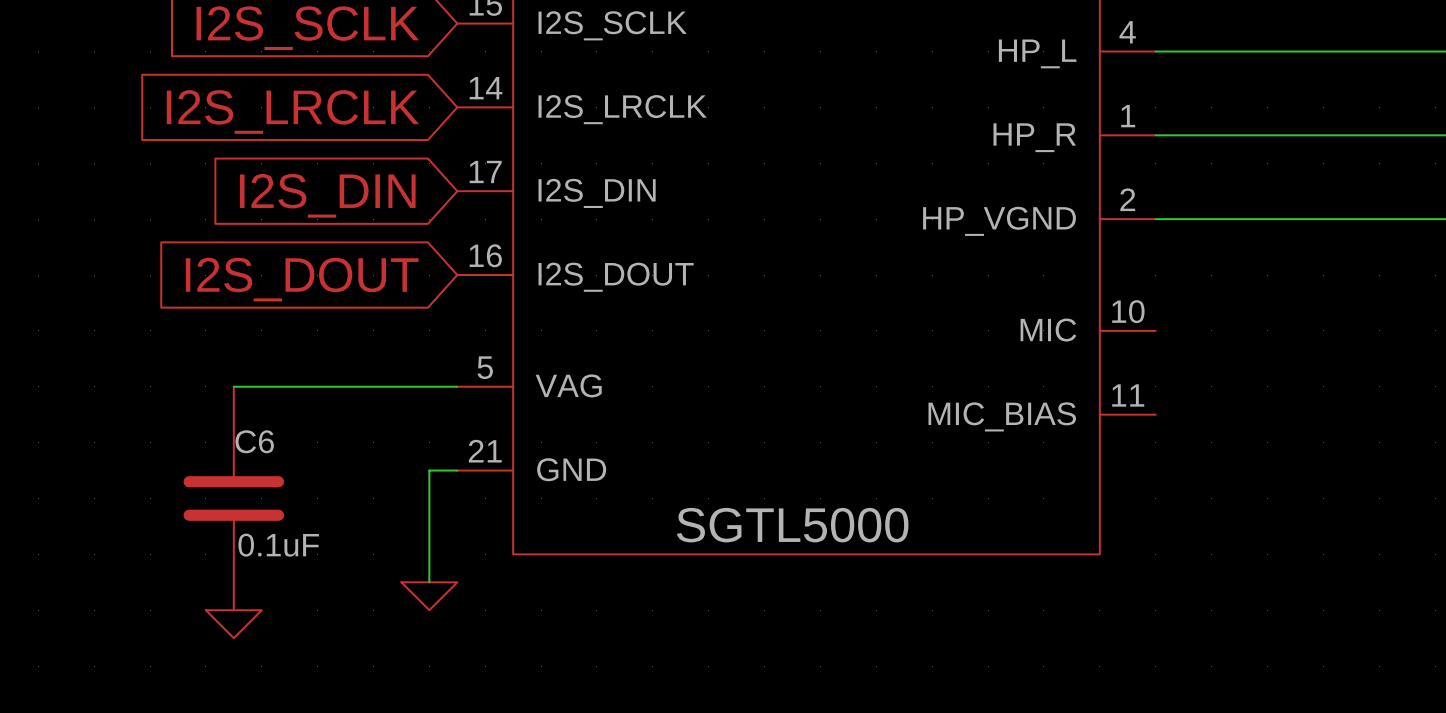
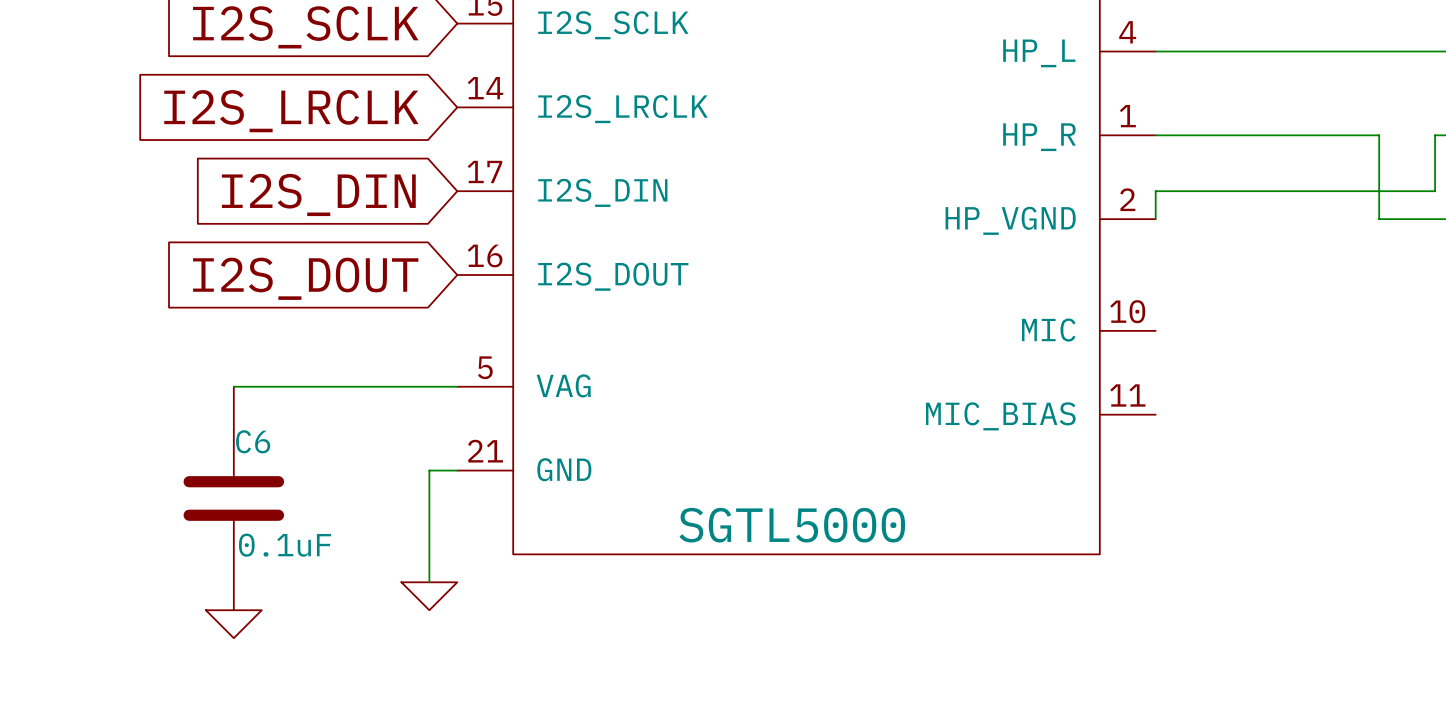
wire: (1379, 135) (1435, 135) -> (1379, 135) (1379, 219)
wire: (1155, 219) (1379, 219) -> (1155, 219) (1155, 191) (1435, 191) (1435, 135)

